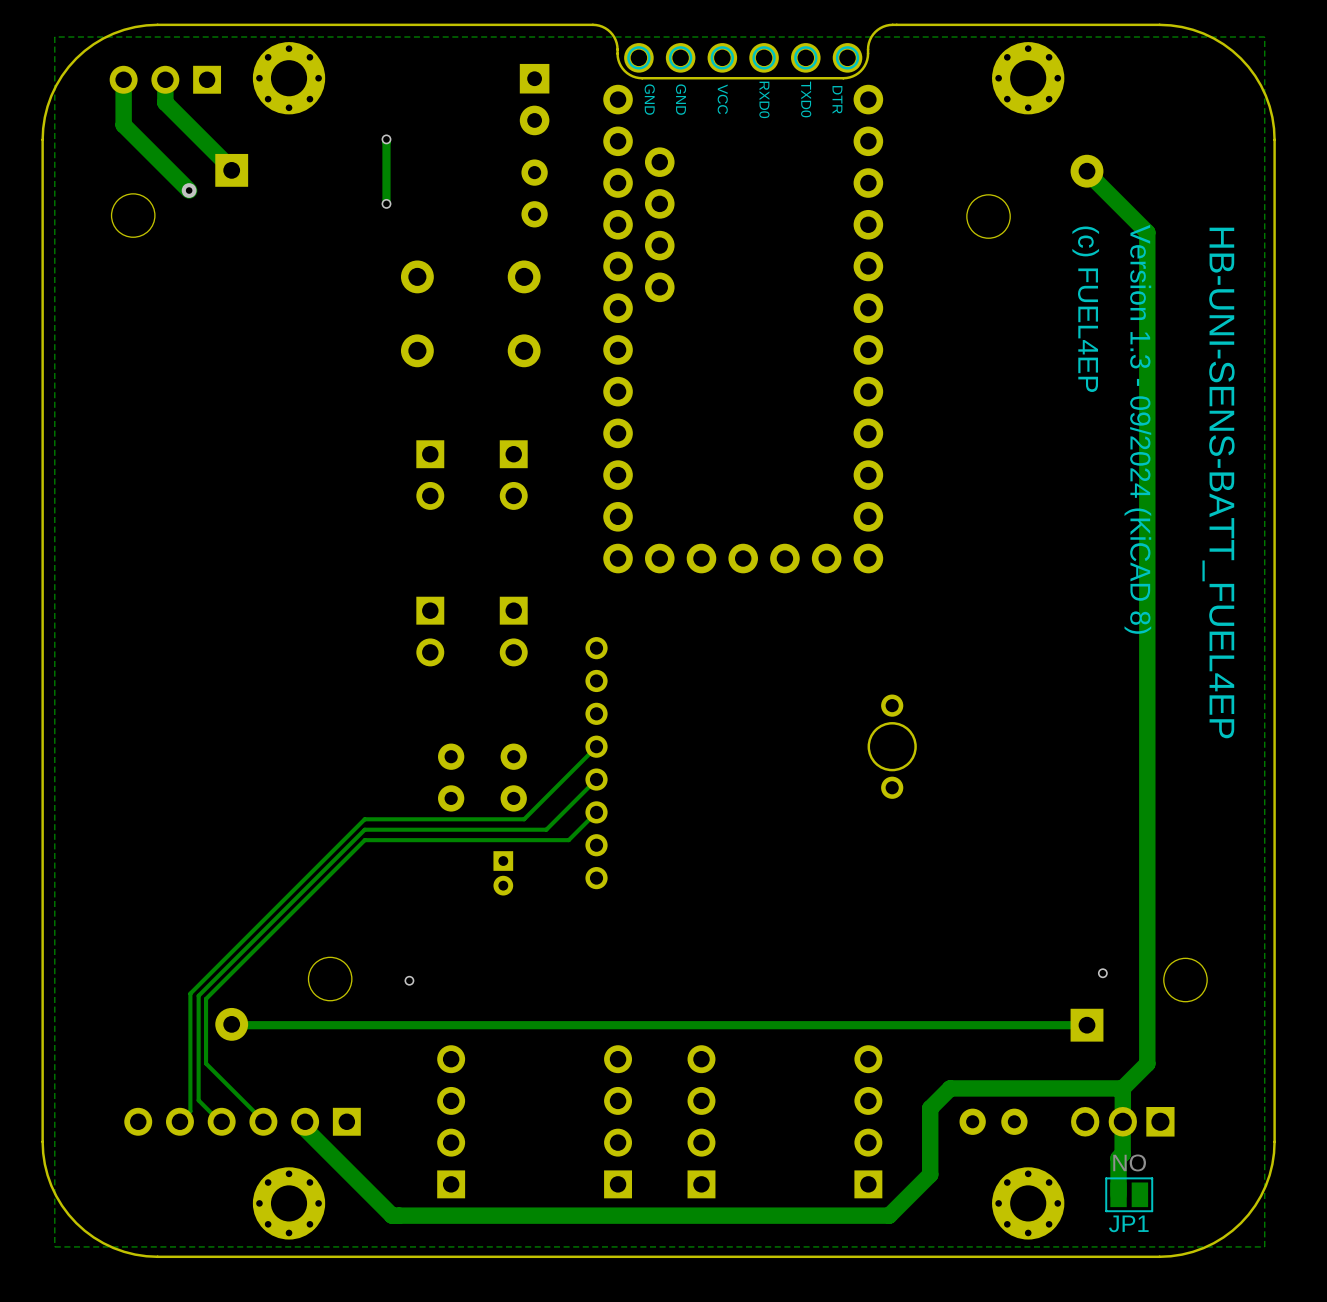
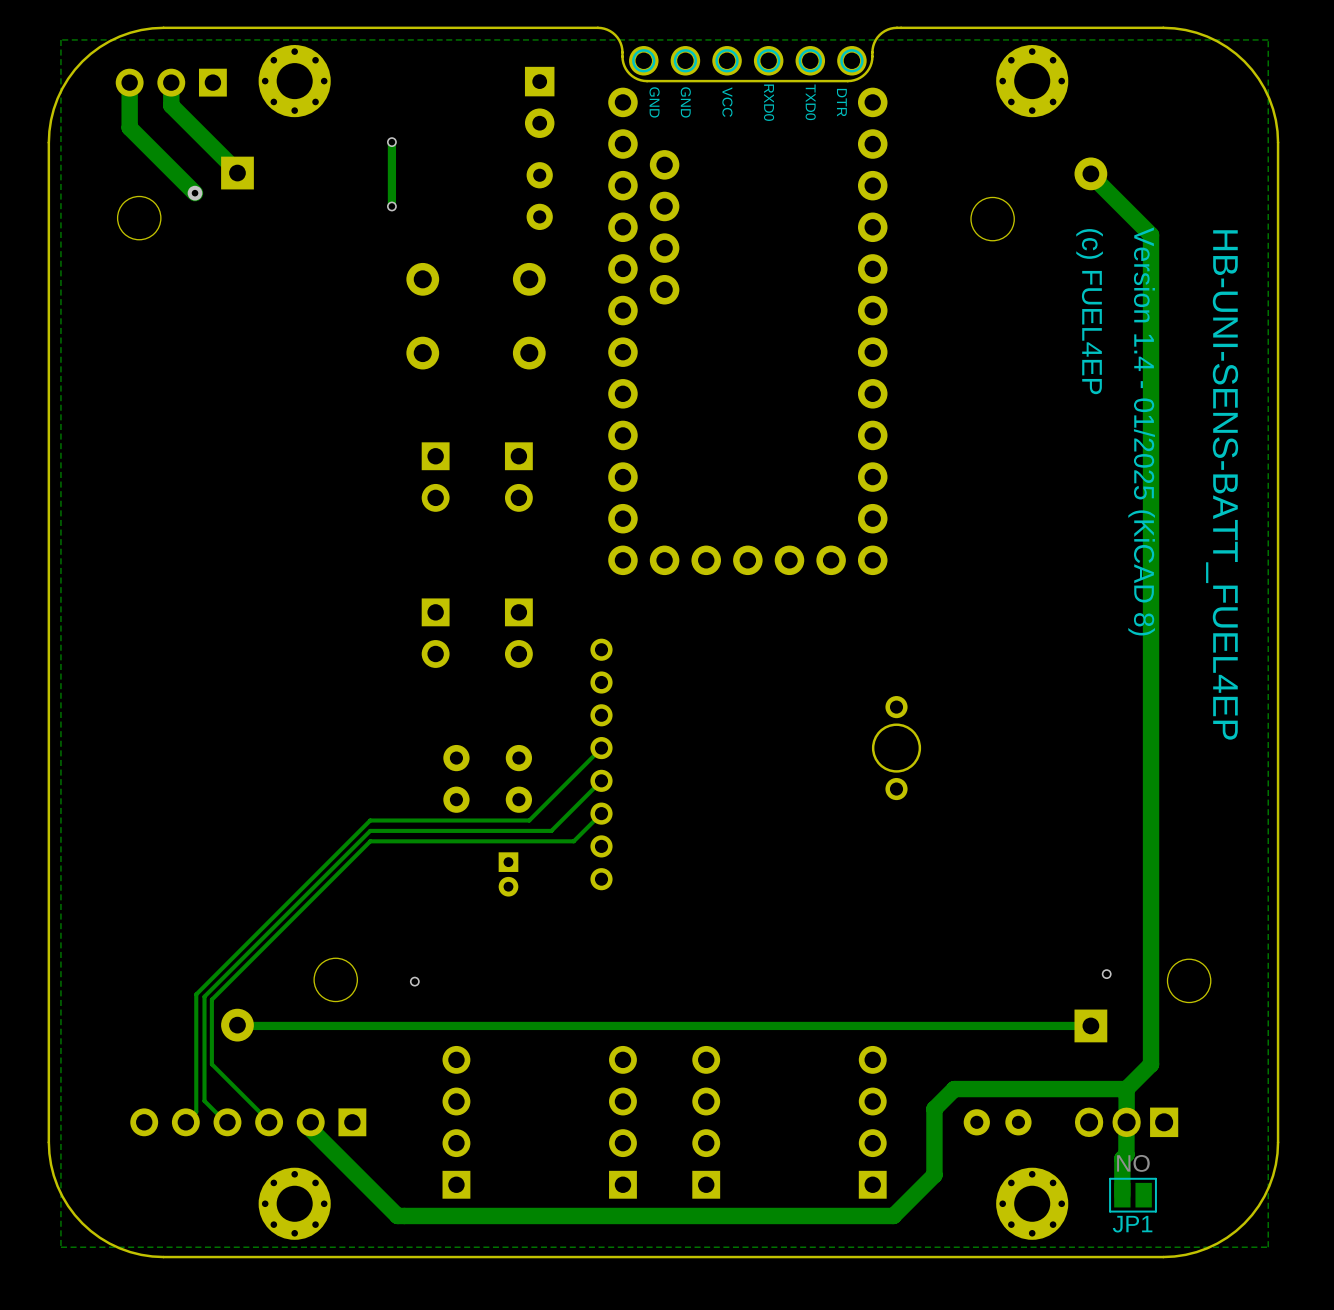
text: Version 1.3 - 09/2024 (KiCAD 8) (1137, 429) -> Version 1.4 - 01/2025 (KiCAD 8) (1141, 431)

